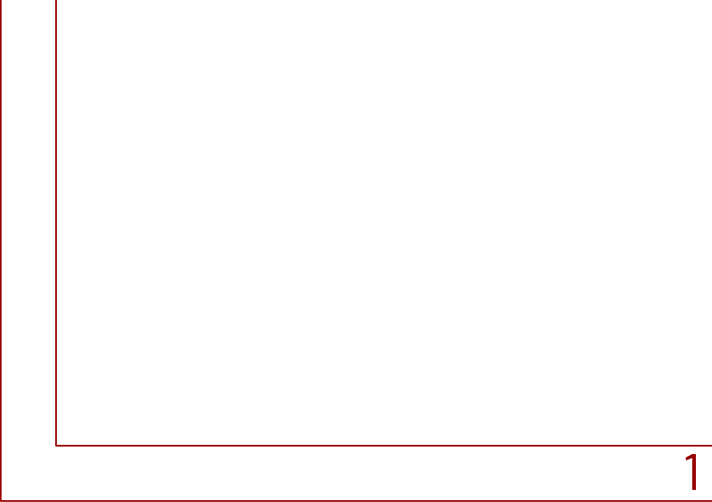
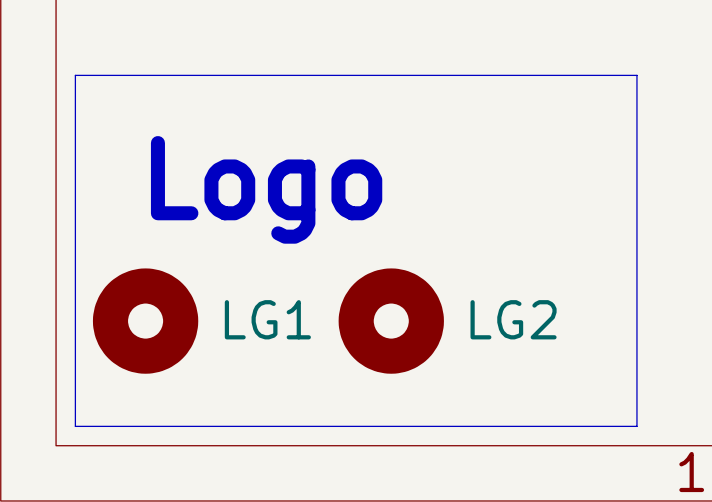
line: none -> (75, 75) (636, 75) (636, 426) (75, 426) (75, 75)
text: none -> Logo (266, 189)
LG1: none -> (145, 321)
LG2: none -> (391, 321)

